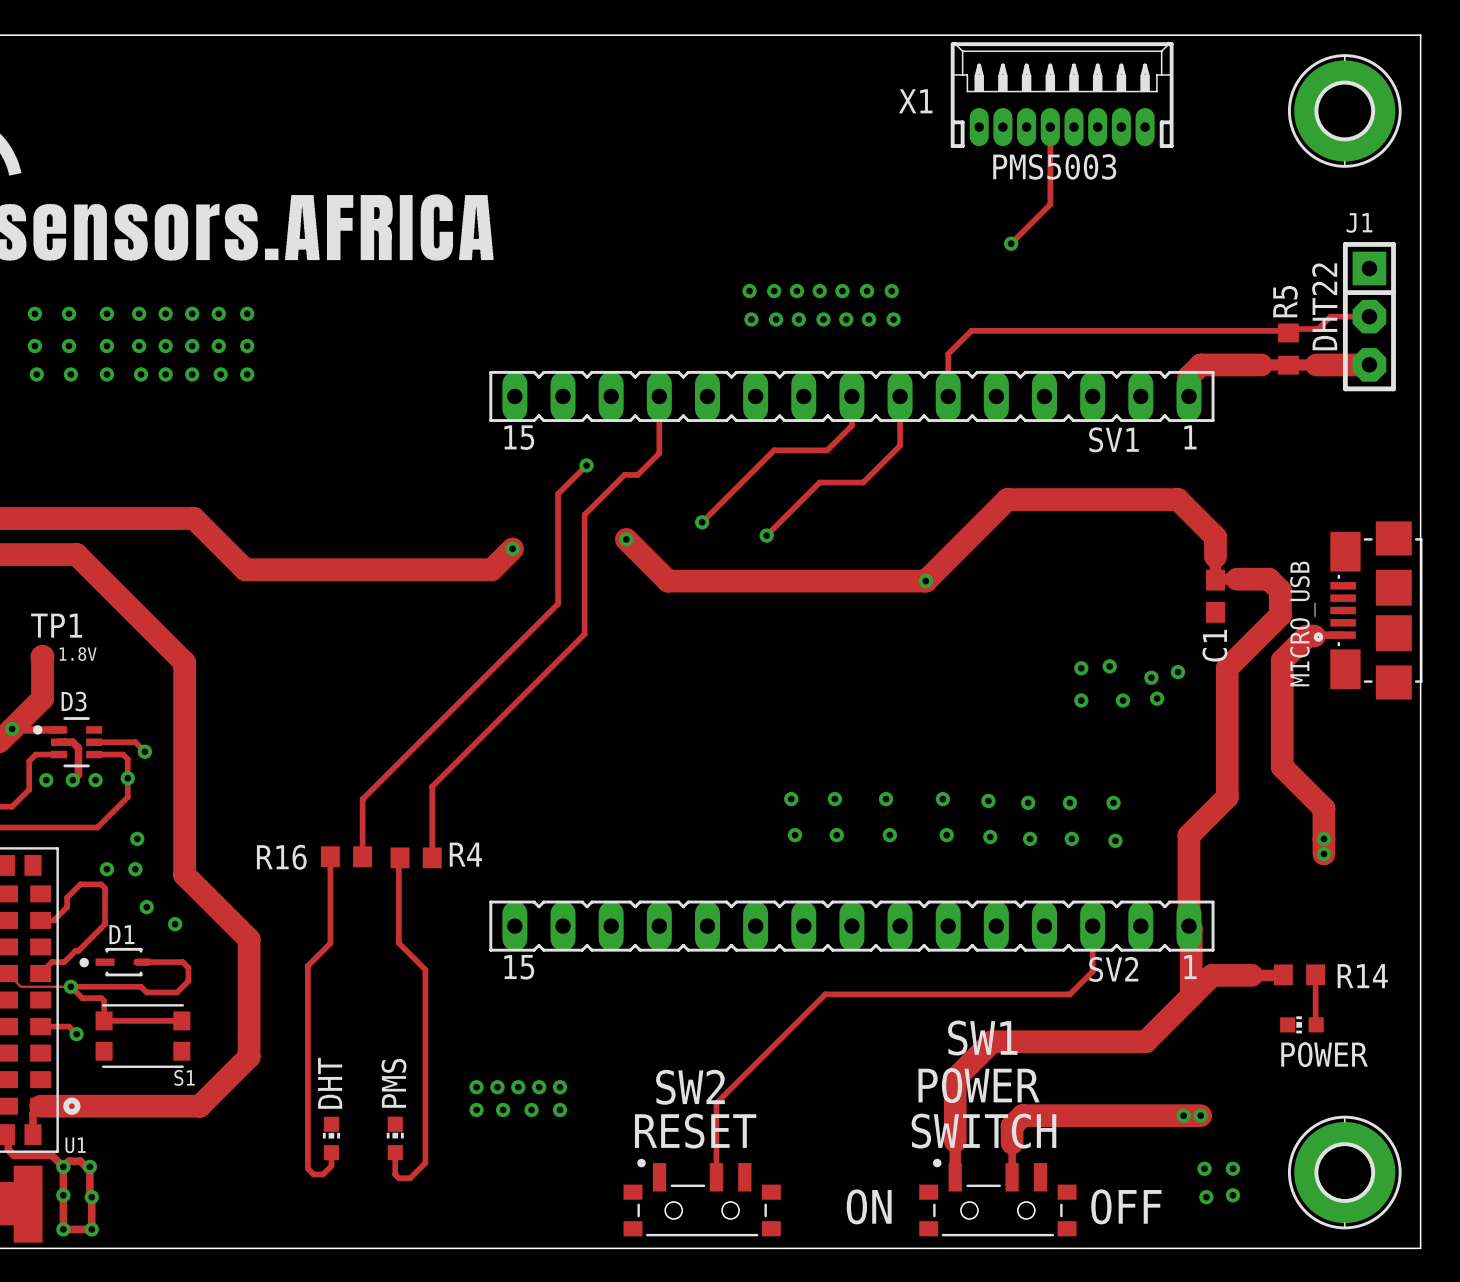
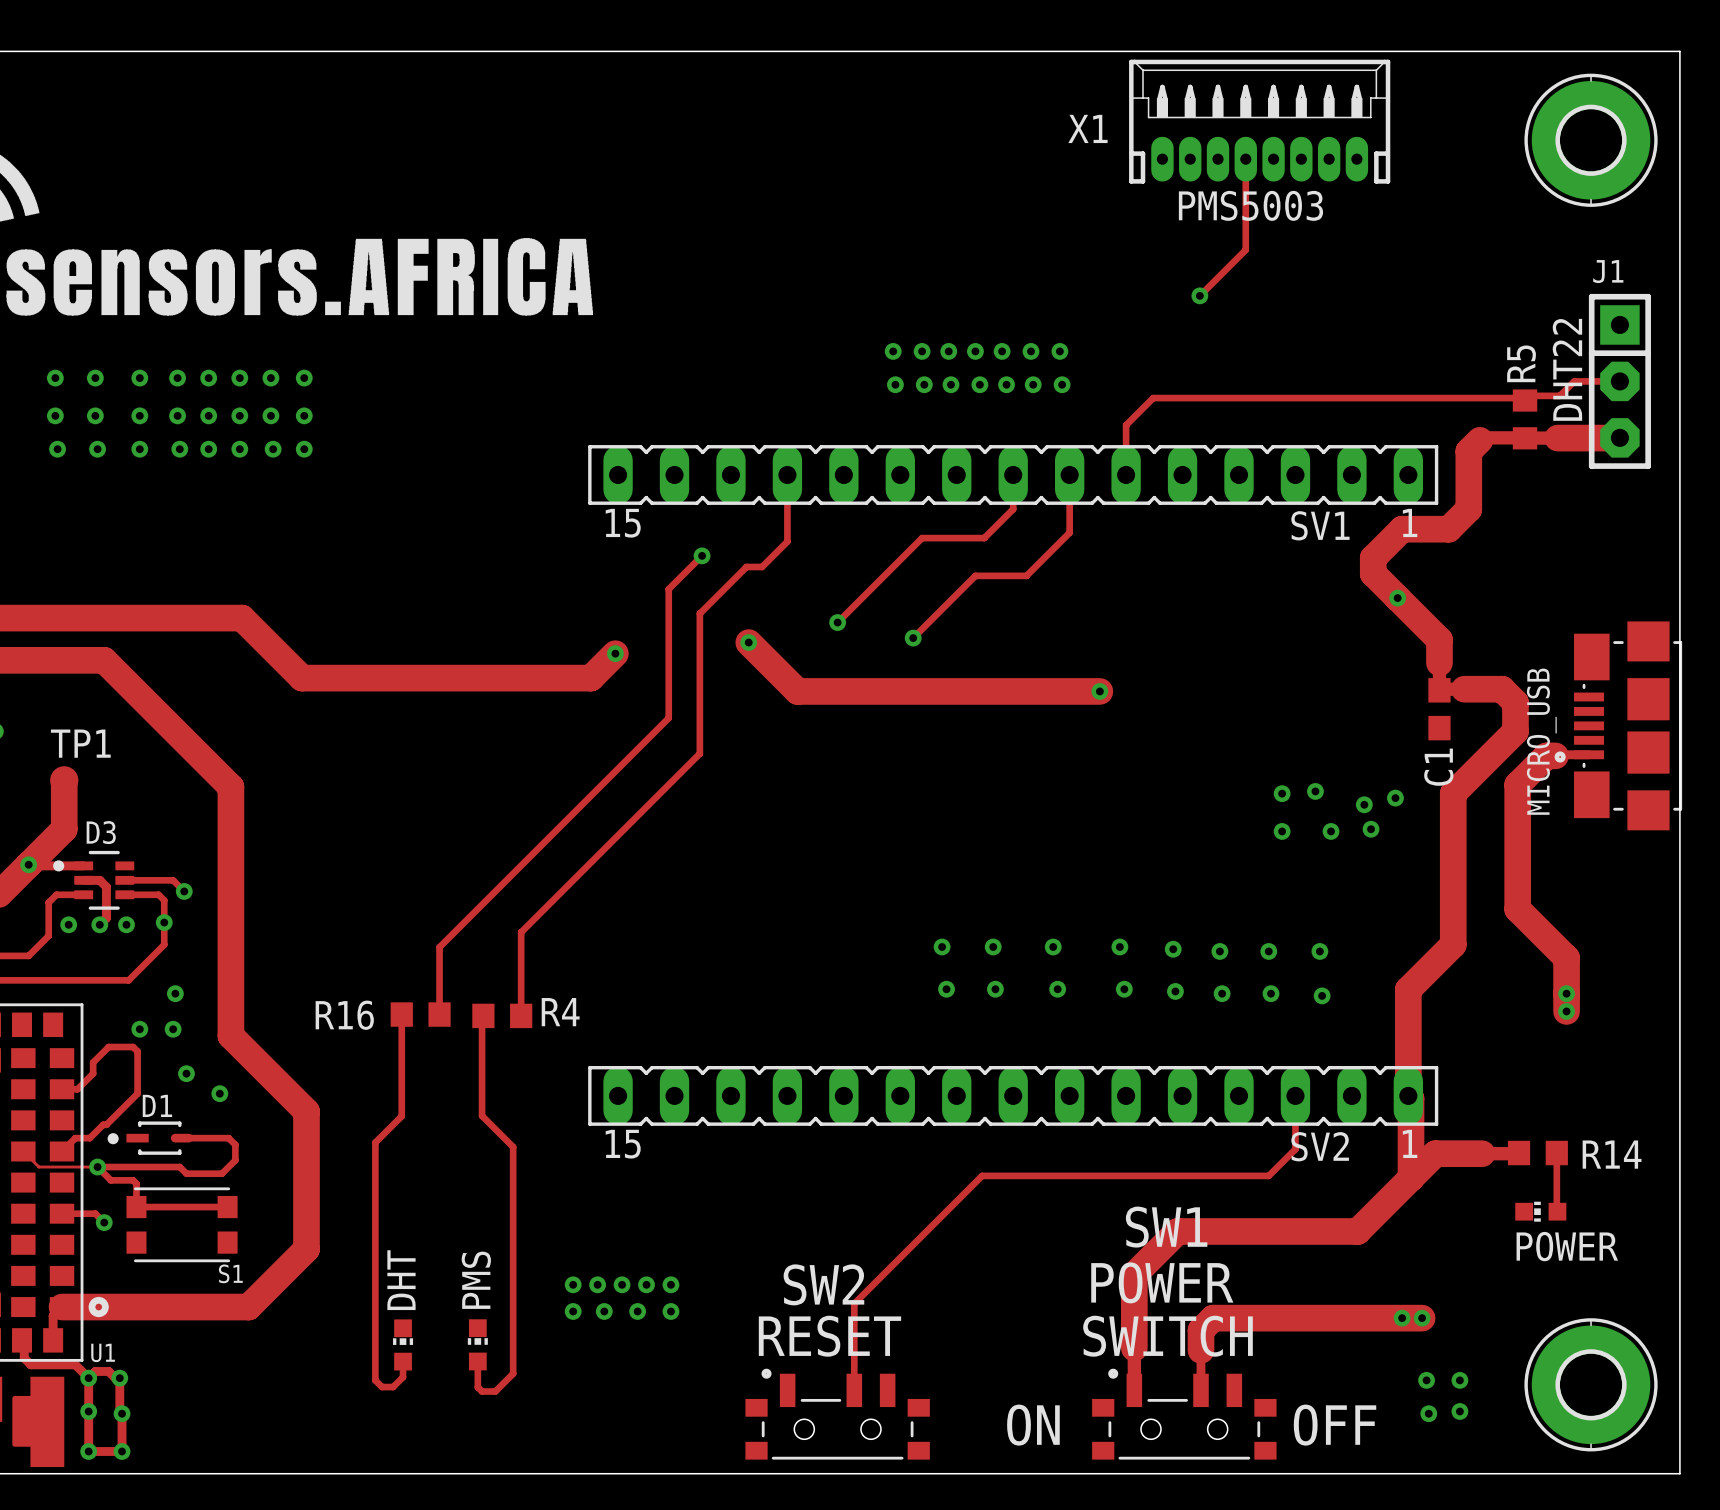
track: (1288, 364) (1200, 364) (1188, 376) (1188, 396) -> (1525, 438) (1482, 437) (1468, 451) (1468, 509) (1448, 529) (1402, 529) (1373, 558) (1373, 573) (1395, 595)
track: (1177, 499) (1007, 499) (925, 581) -> none
via: none -> (1397, 598)
text: 1.8V (78, 654) -> none

